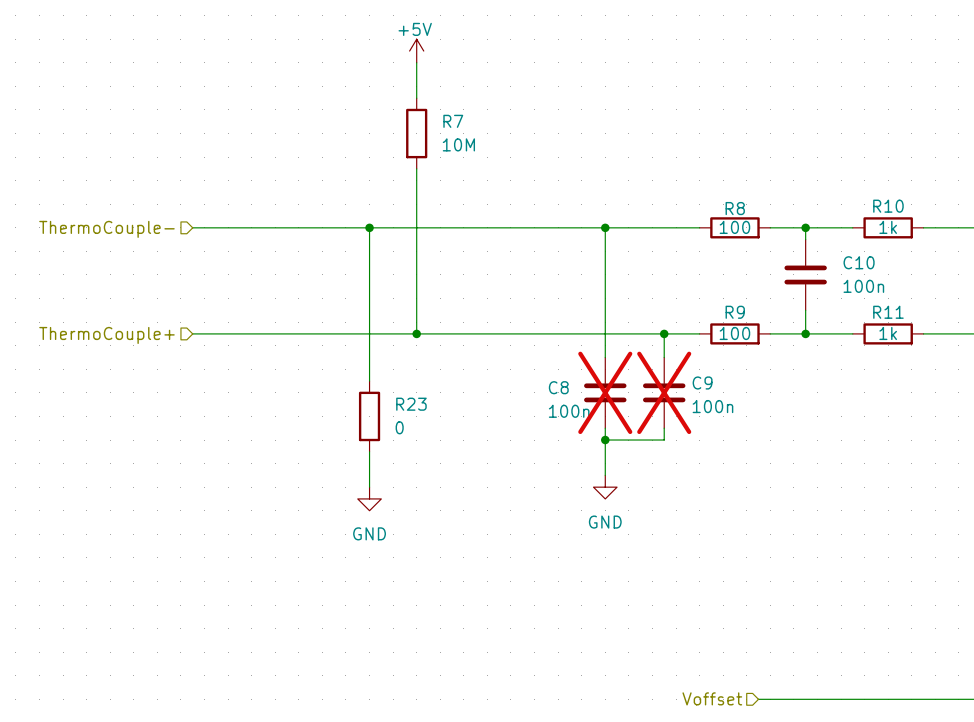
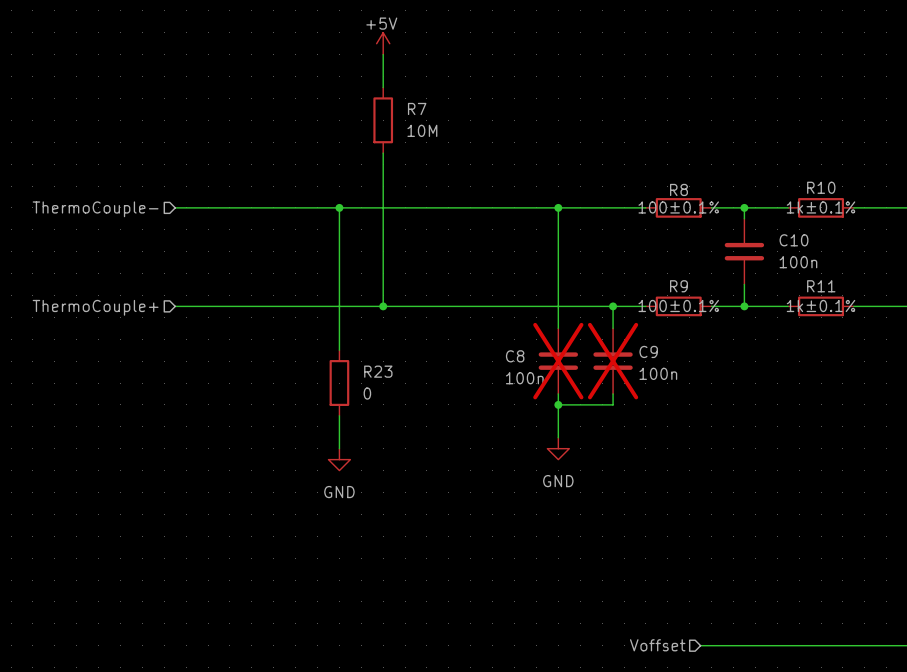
R8 value: 100 (734, 227) -> 100±0.1% (678, 207)
R10 value: 1k (888, 227) -> 1k±0.1% (821, 207)
R9 value: 100 (734, 333) -> 100±0.1% (678, 305)
R11 value: 1k (888, 333) -> 1k±0.1% (821, 305)

